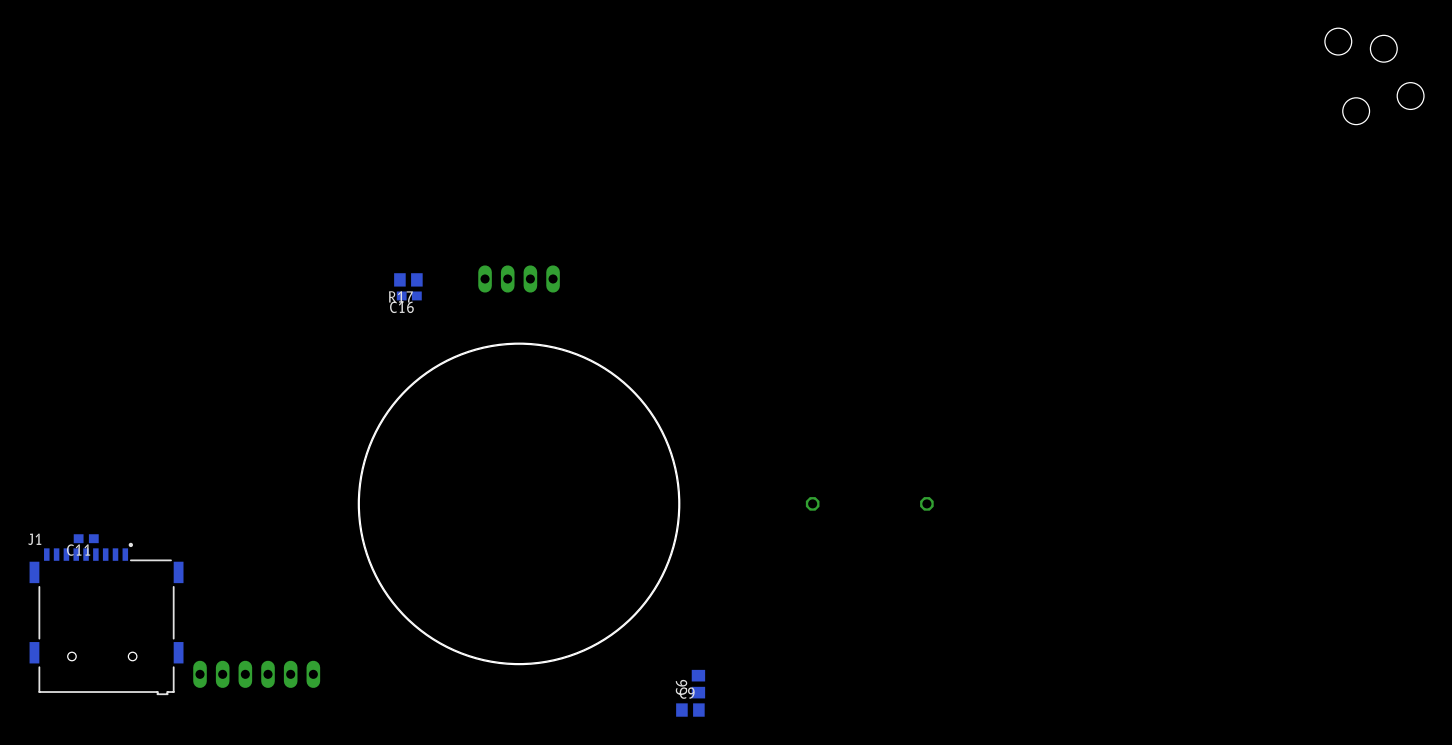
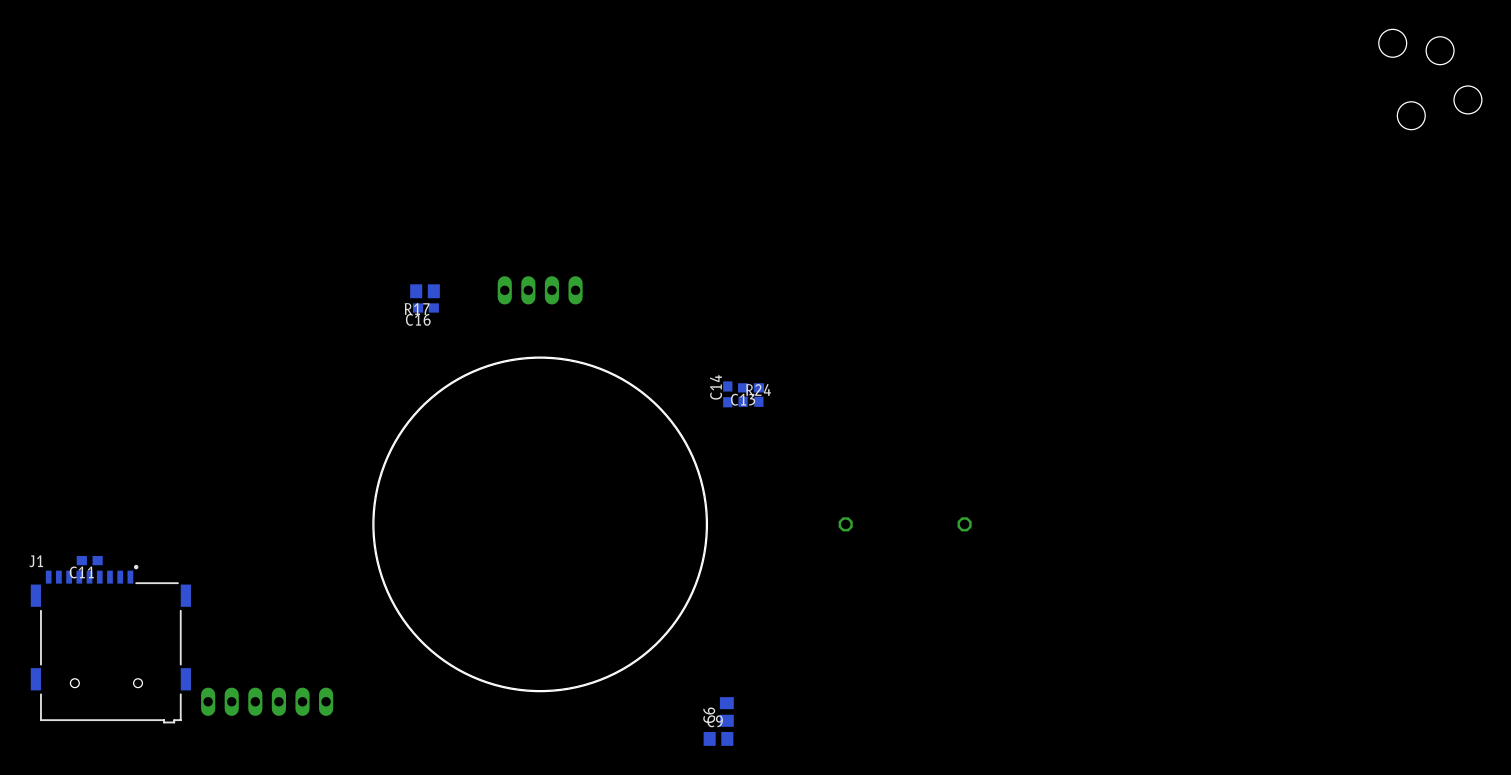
C13: none -> (750, 387)
C14: none -> (727, 394)
R24: none -> (750, 401)

